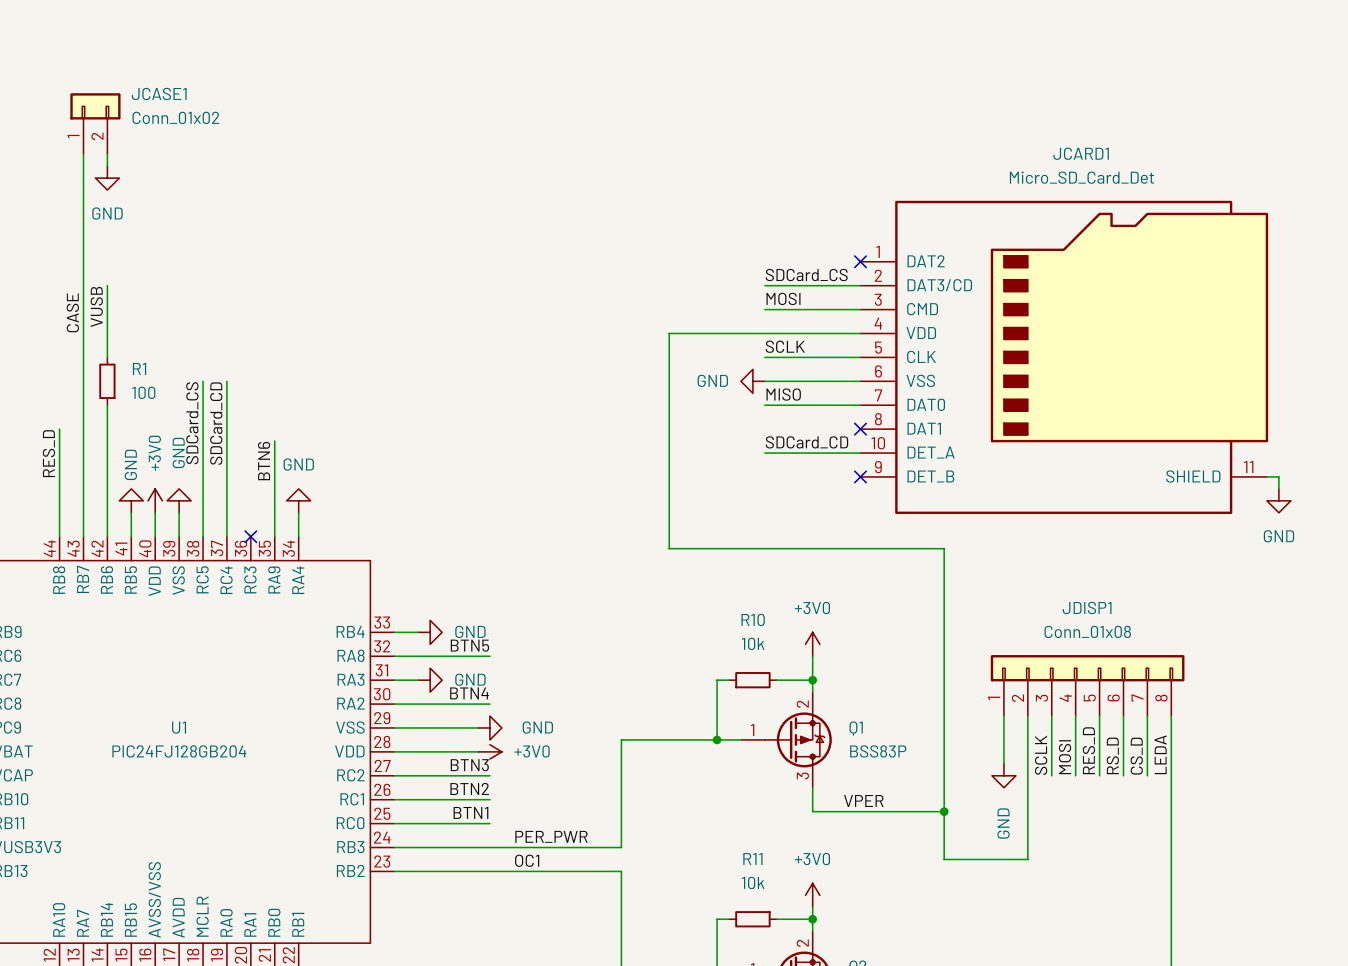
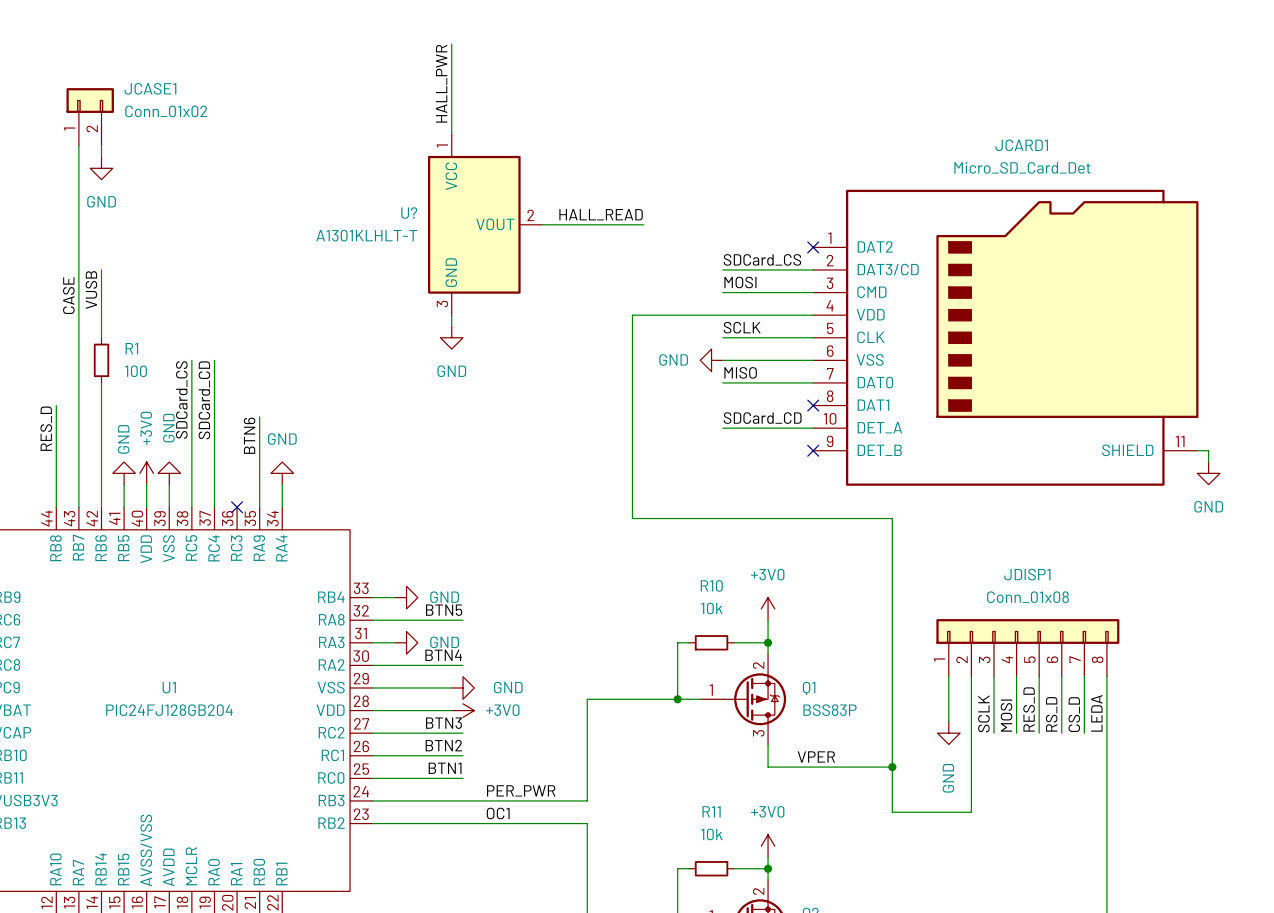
wire: none -> (451, 44) (451, 134)
label: none -> HALL_PWR (441, 83)
label: none -> HALL_READ (601, 214)
U?: none -> A1301KLHLT-T (485, 224)
wire: none -> (542, 224) (643, 224)
wire: none -> (451, 315) (451, 326)
power symbol: none -> GND (451, 337)

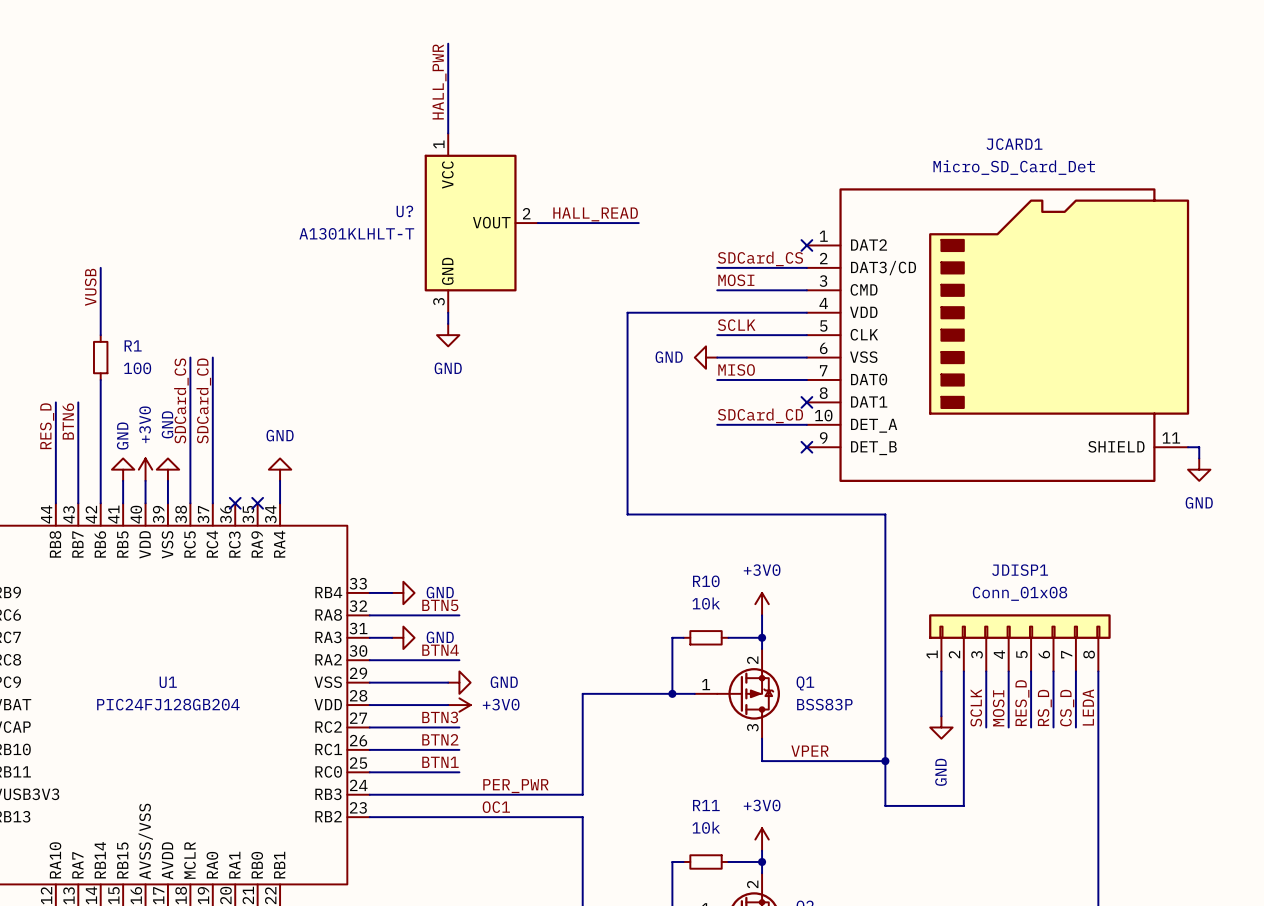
JCASE1: Conn_01x02 (90, 116) -> none
wire: (78, 145) (78, 405) -> none
wire: (101, 145) (101, 157) -> none
power symbol: GND (101, 168) -> none
label: CASE (68, 295) -> none
wire: (259, 416) (259, 507) -> none
label position: BTN6 (249, 435) -> BTN6 (68, 421)
no-connect mark: none -> (257, 503)

